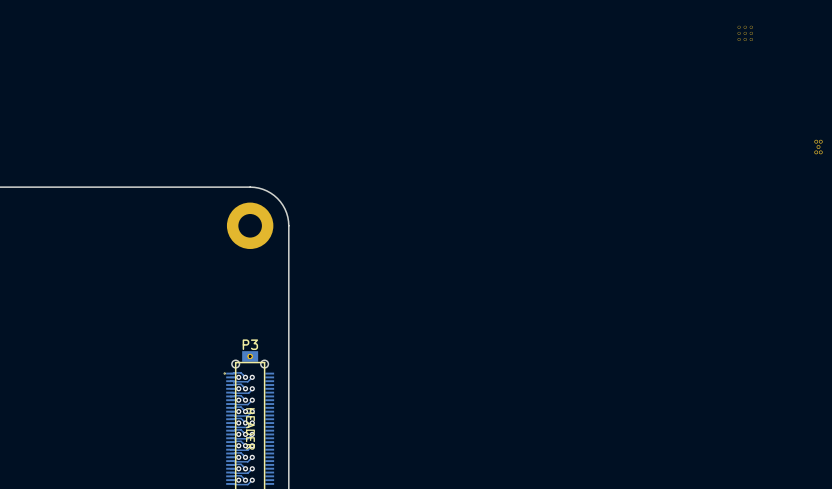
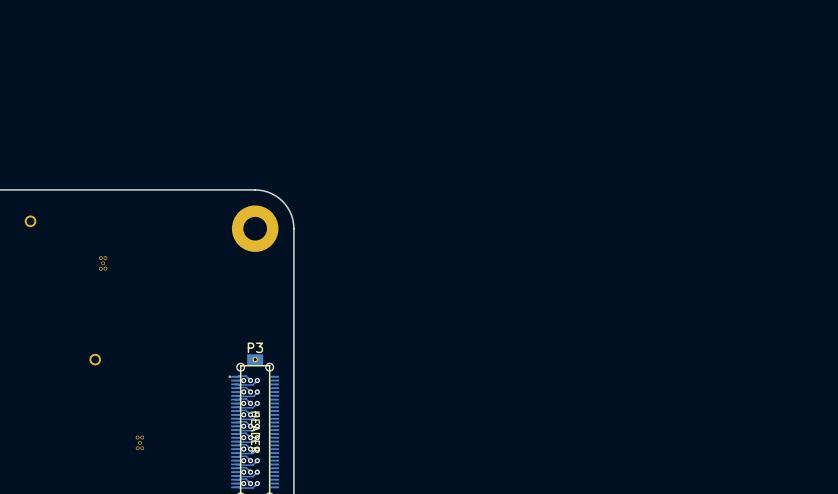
part: (745, 33) -> none
part: (818, 147) -> none
part: none -> (30, 221)
part: none -> (103, 263)
part: none -> (95, 359)
part: none -> (139, 442)

